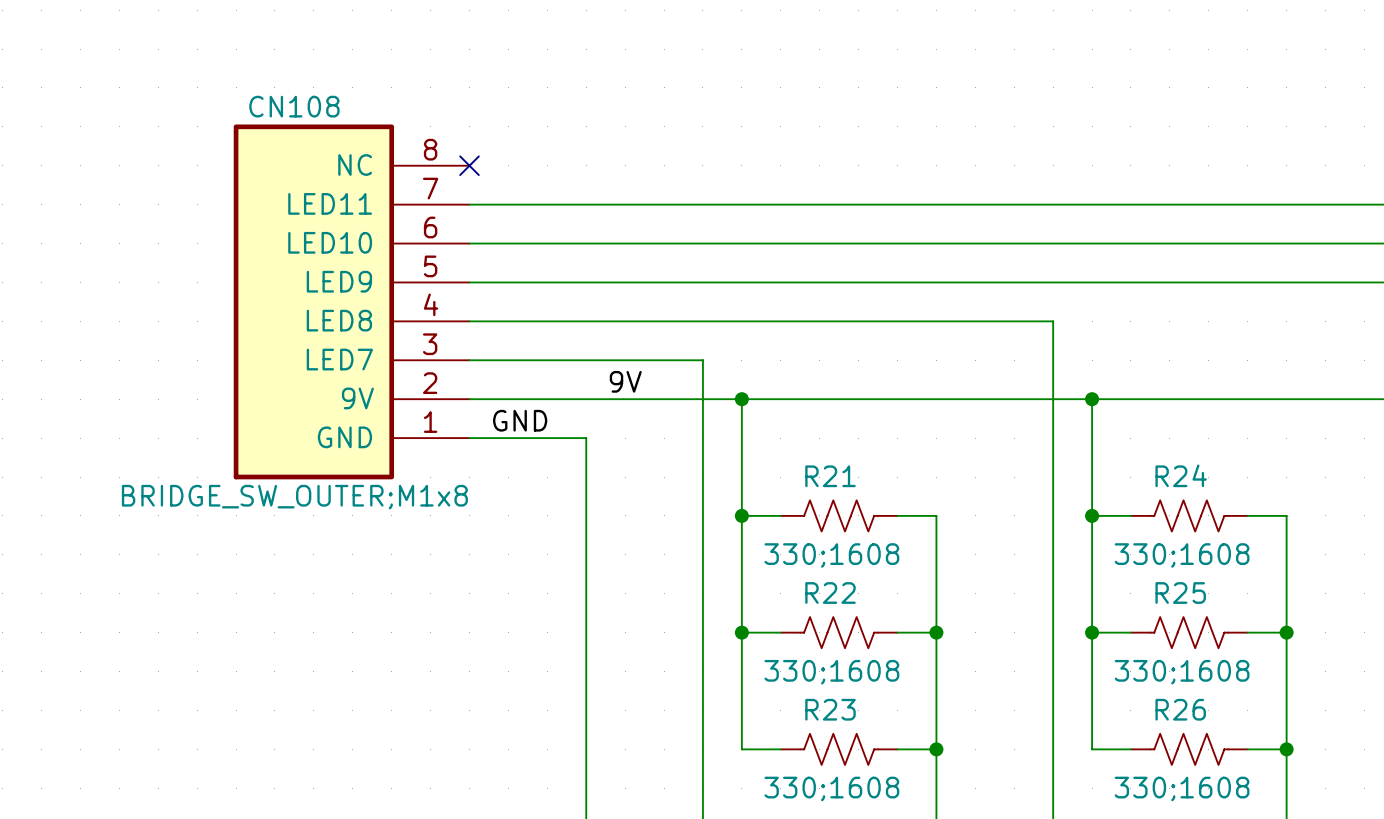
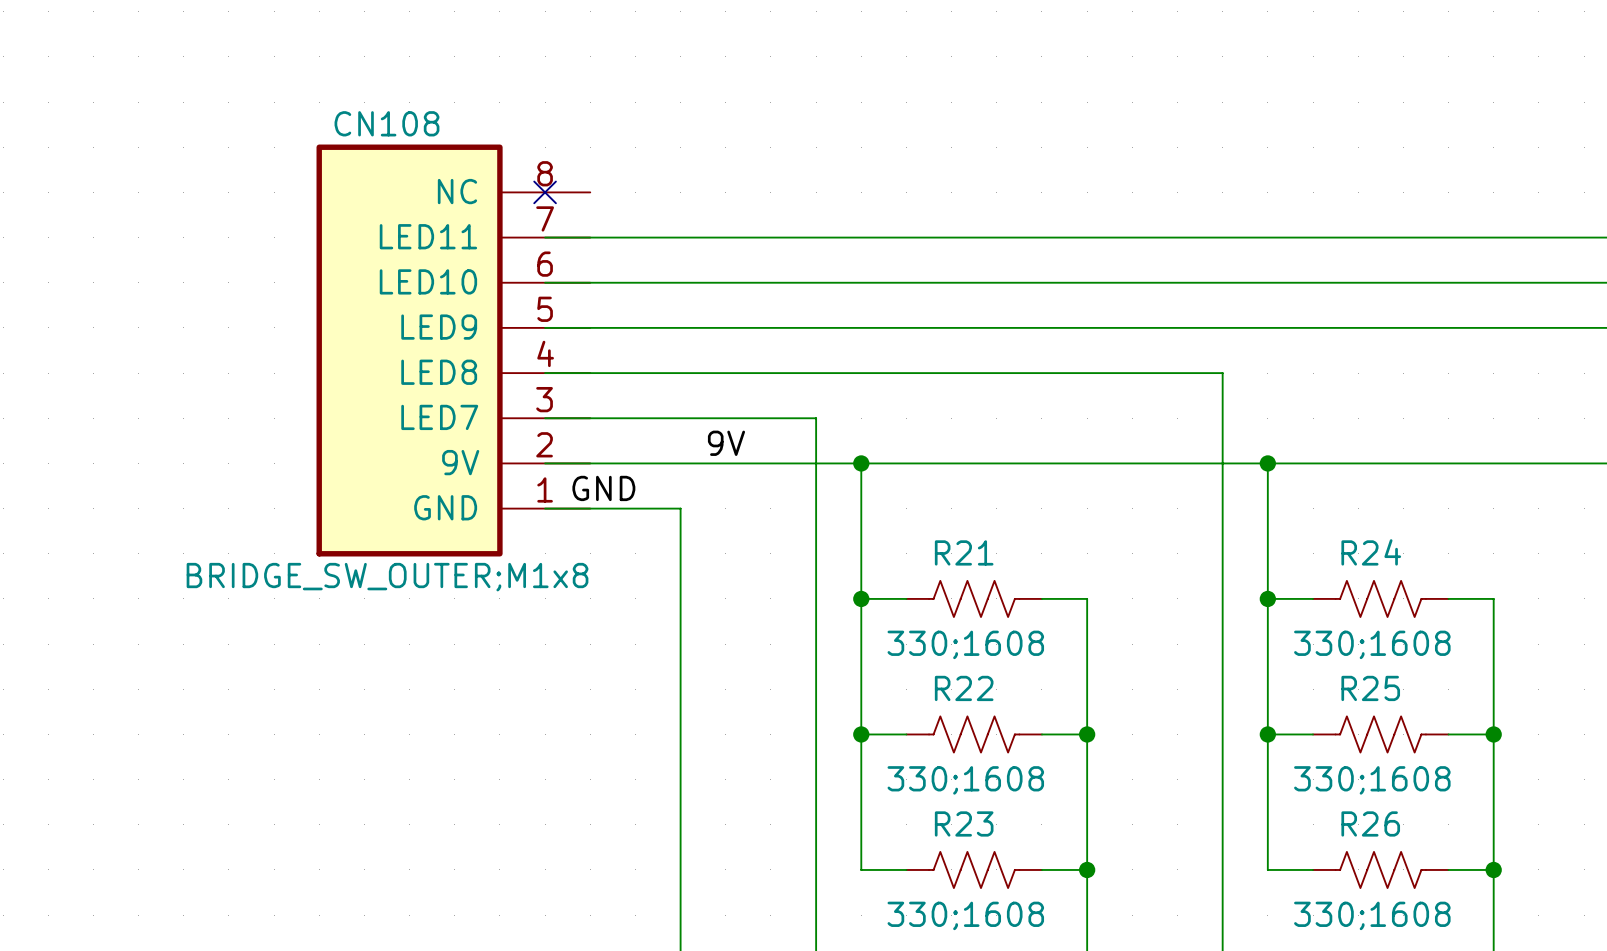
CN108 position: (351, 301) -> (453, 350)

